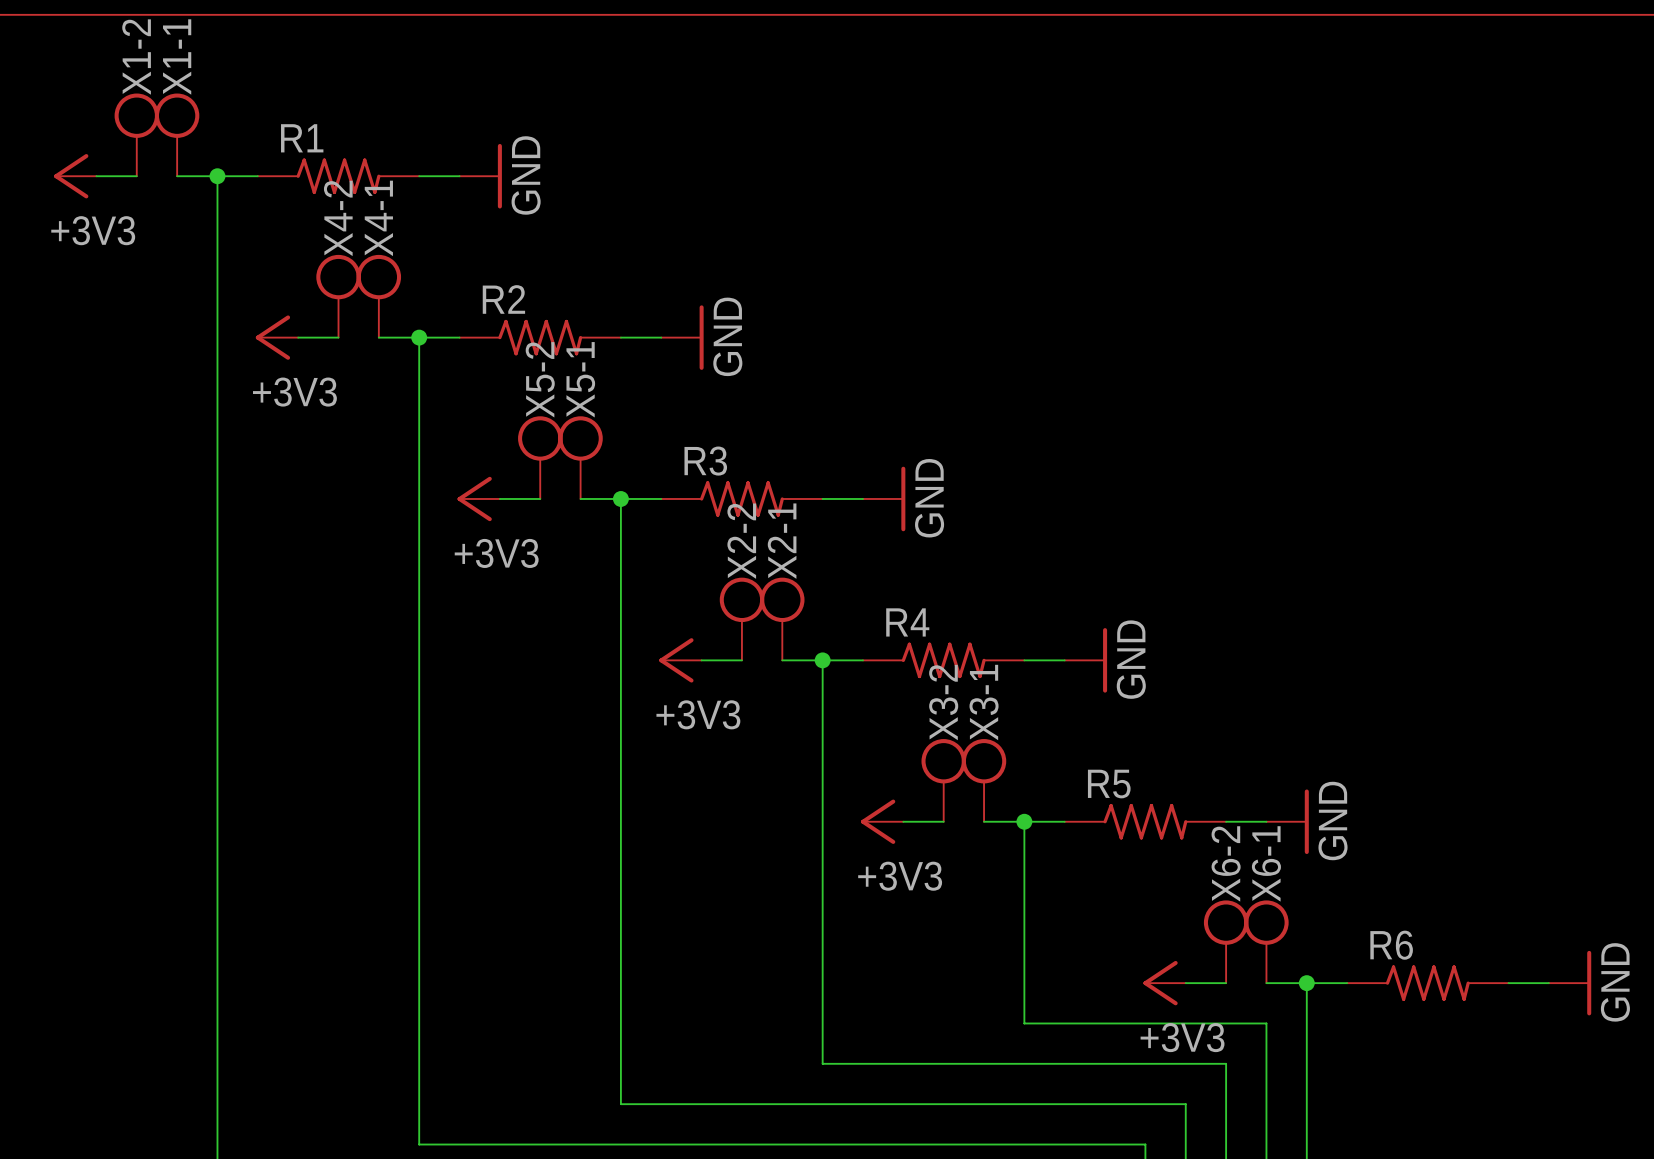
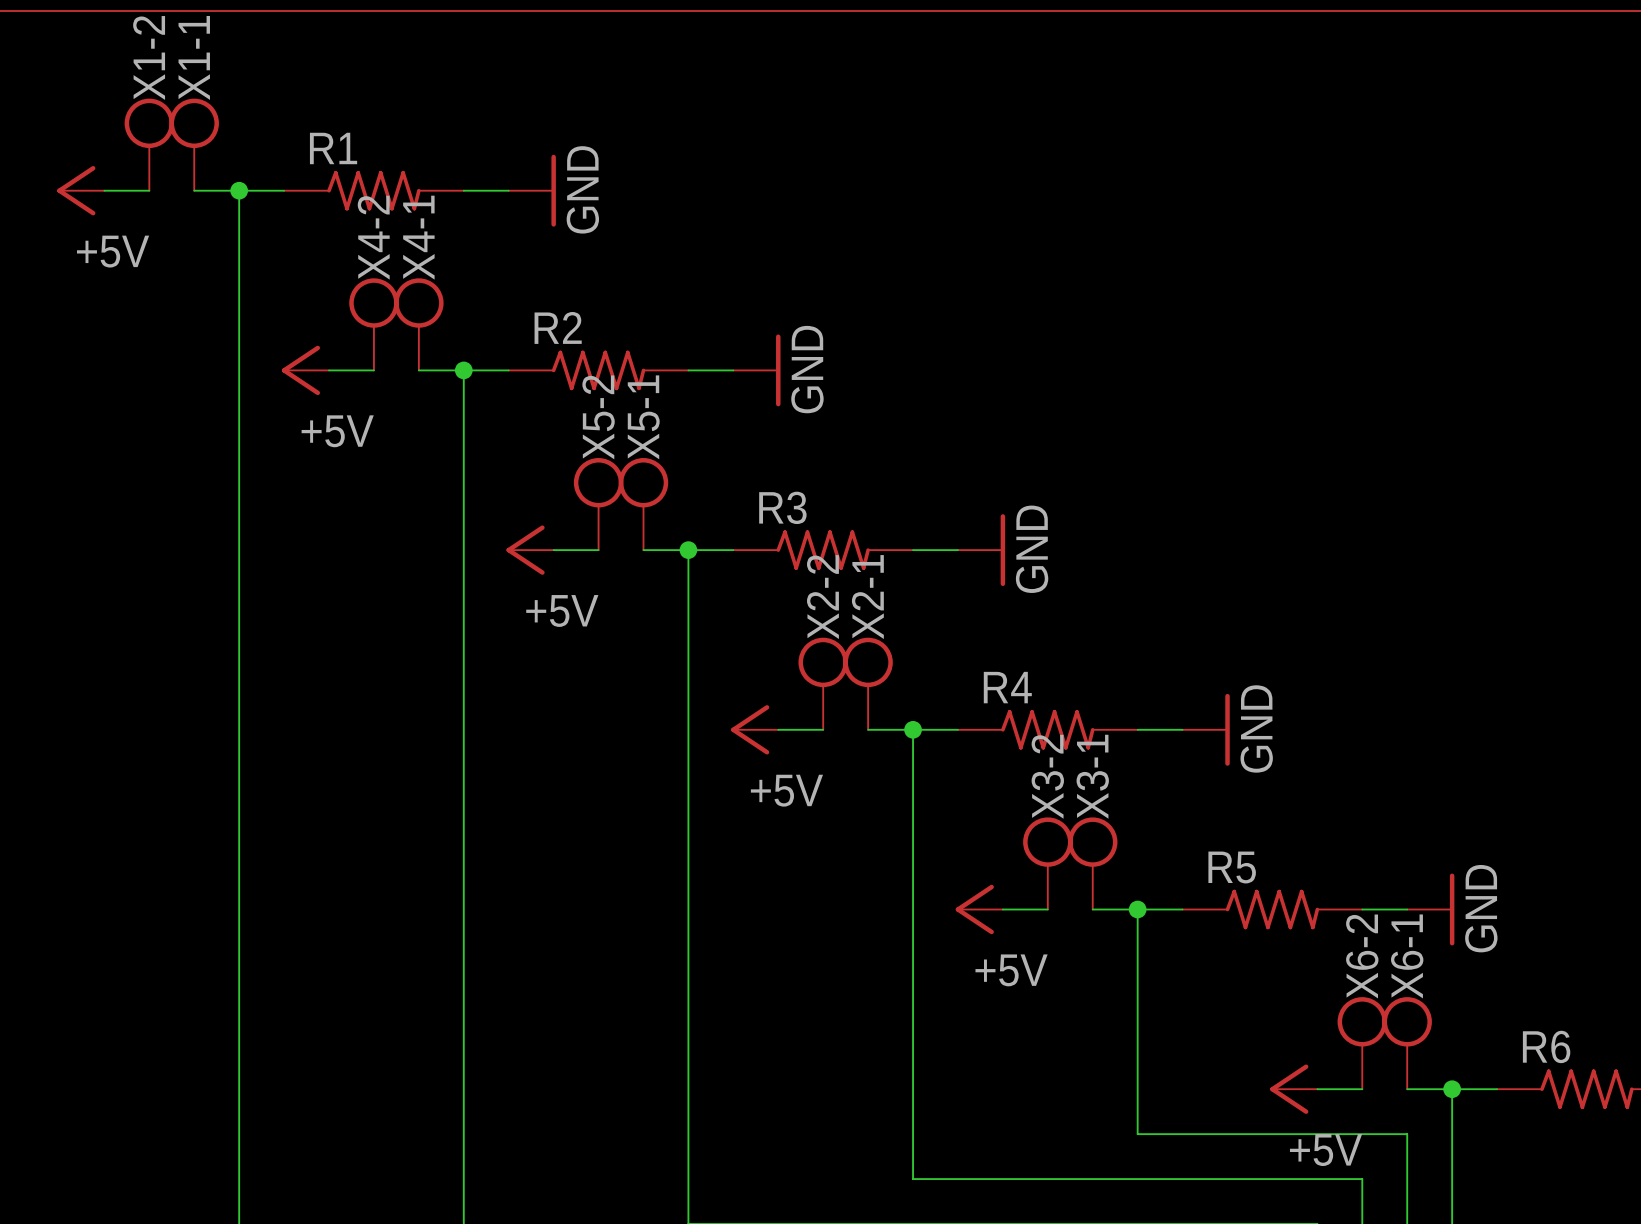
power symbol: +3V3 (75, 176) -> +5V (80, 190)
power symbol: +3V3 (276, 337) -> +5V (305, 370)
power symbol: +3V3 (478, 498) -> +5V (530, 550)
power symbol: +3V3 (680, 660) -> +5V (754, 729)
power symbol: +3V3 (882, 821) -> +5V (979, 909)
power symbol: +3V3 (1164, 983) -> +5V (1293, 1089)

